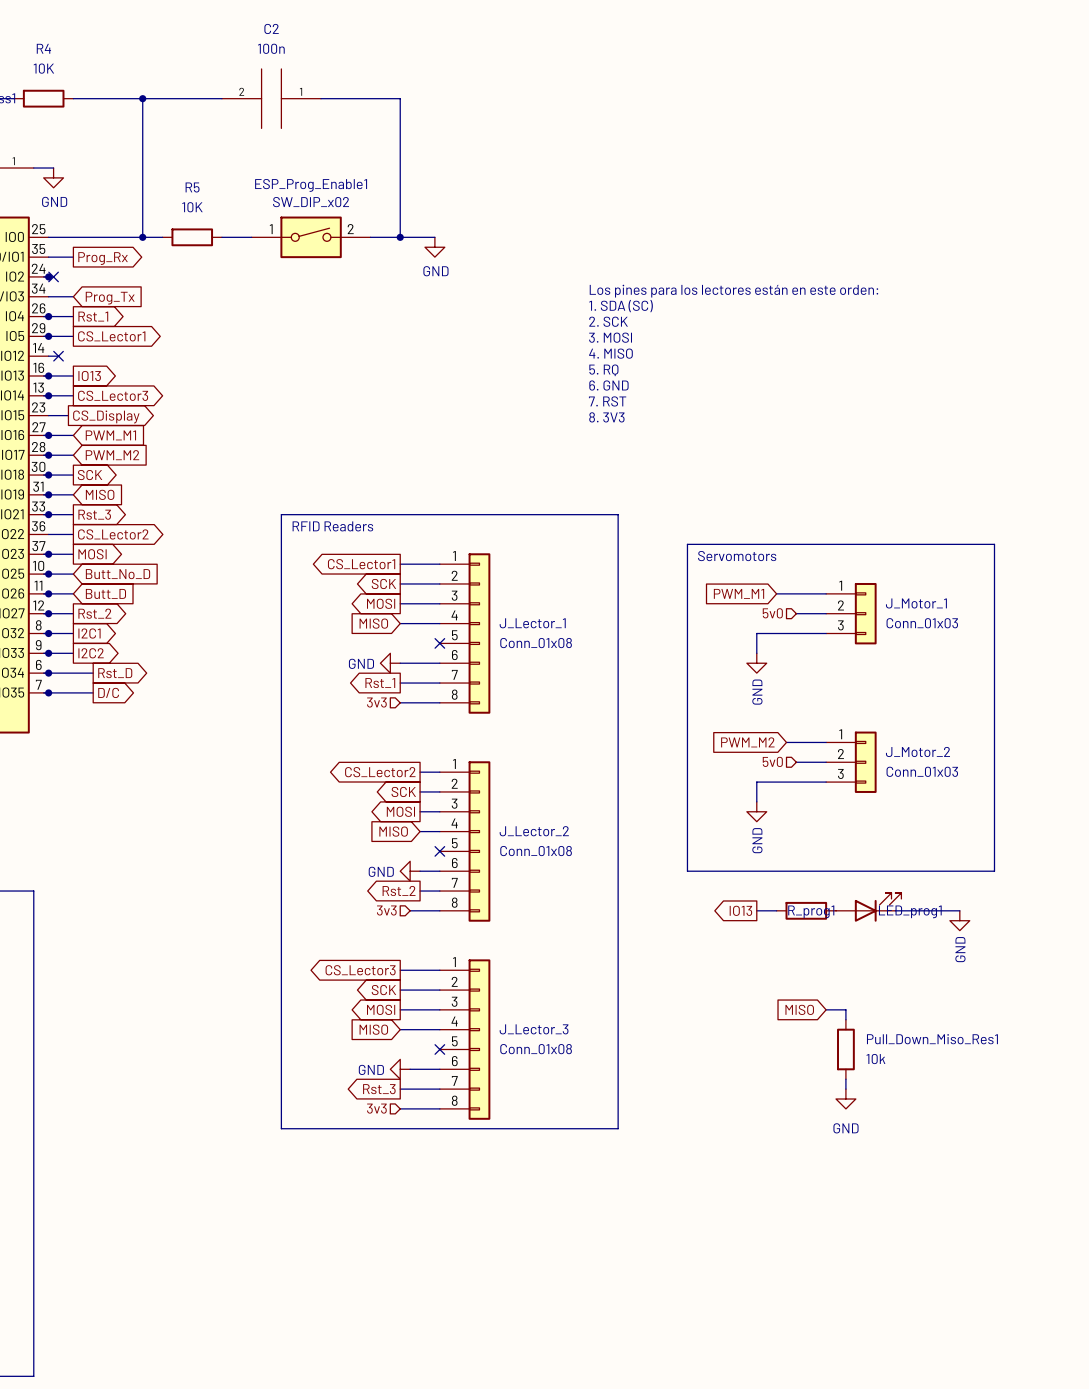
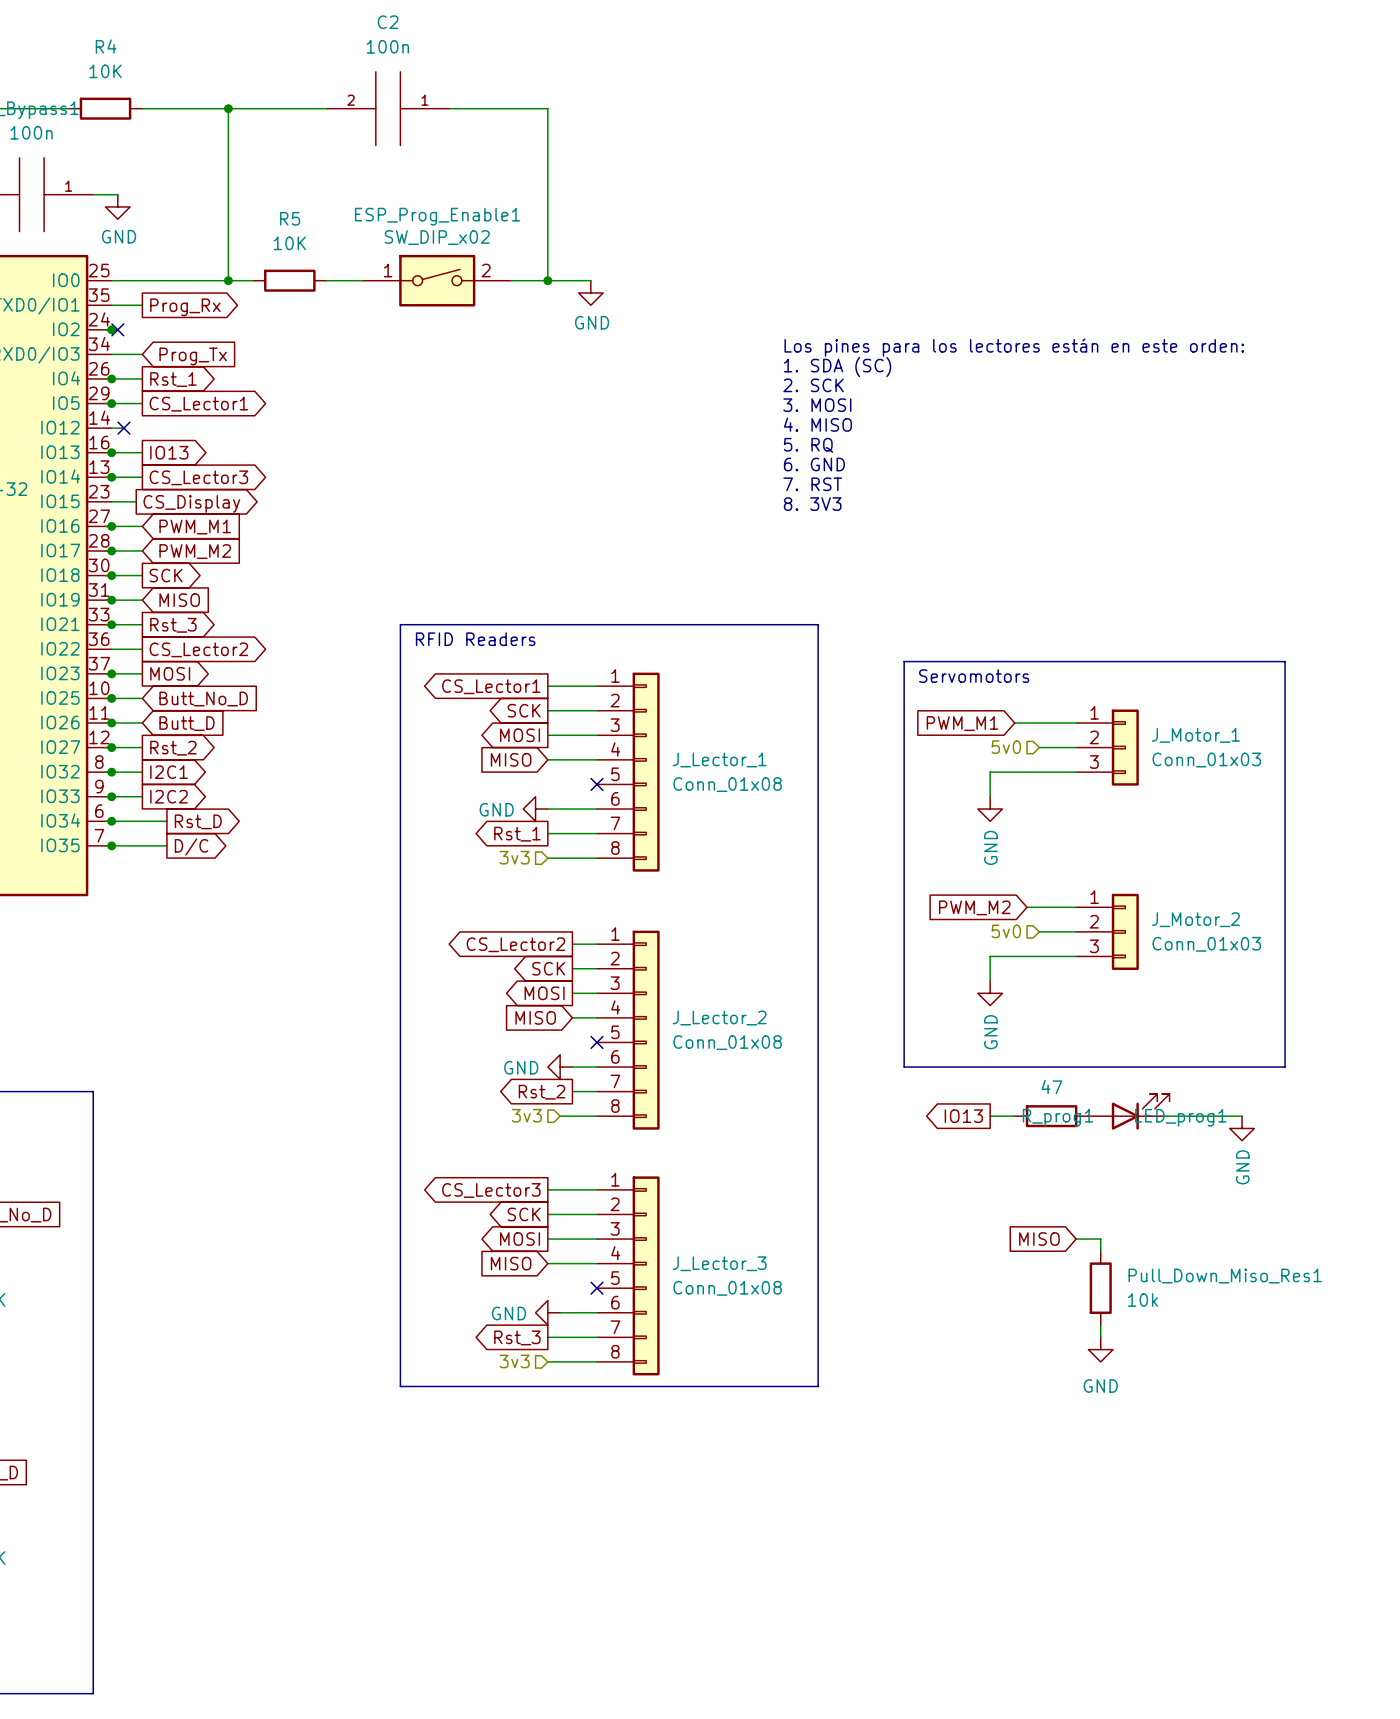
R_prog1 value: none -> 47 (1051, 1086)

